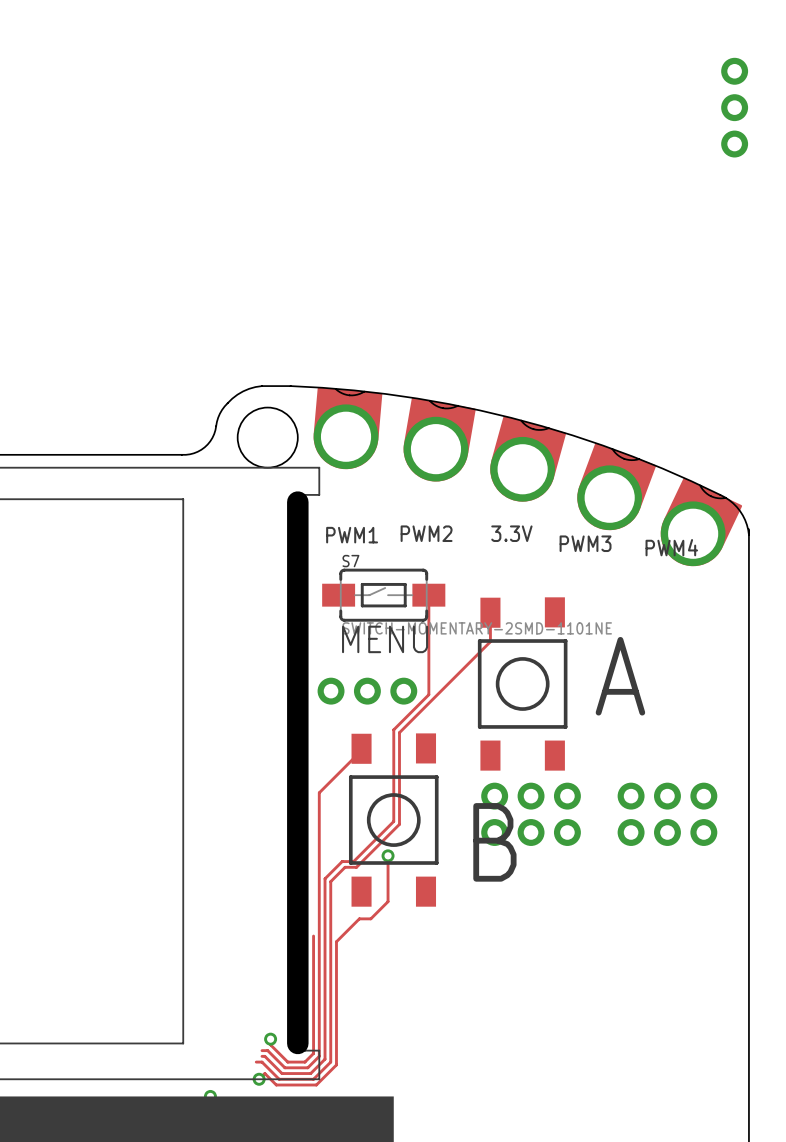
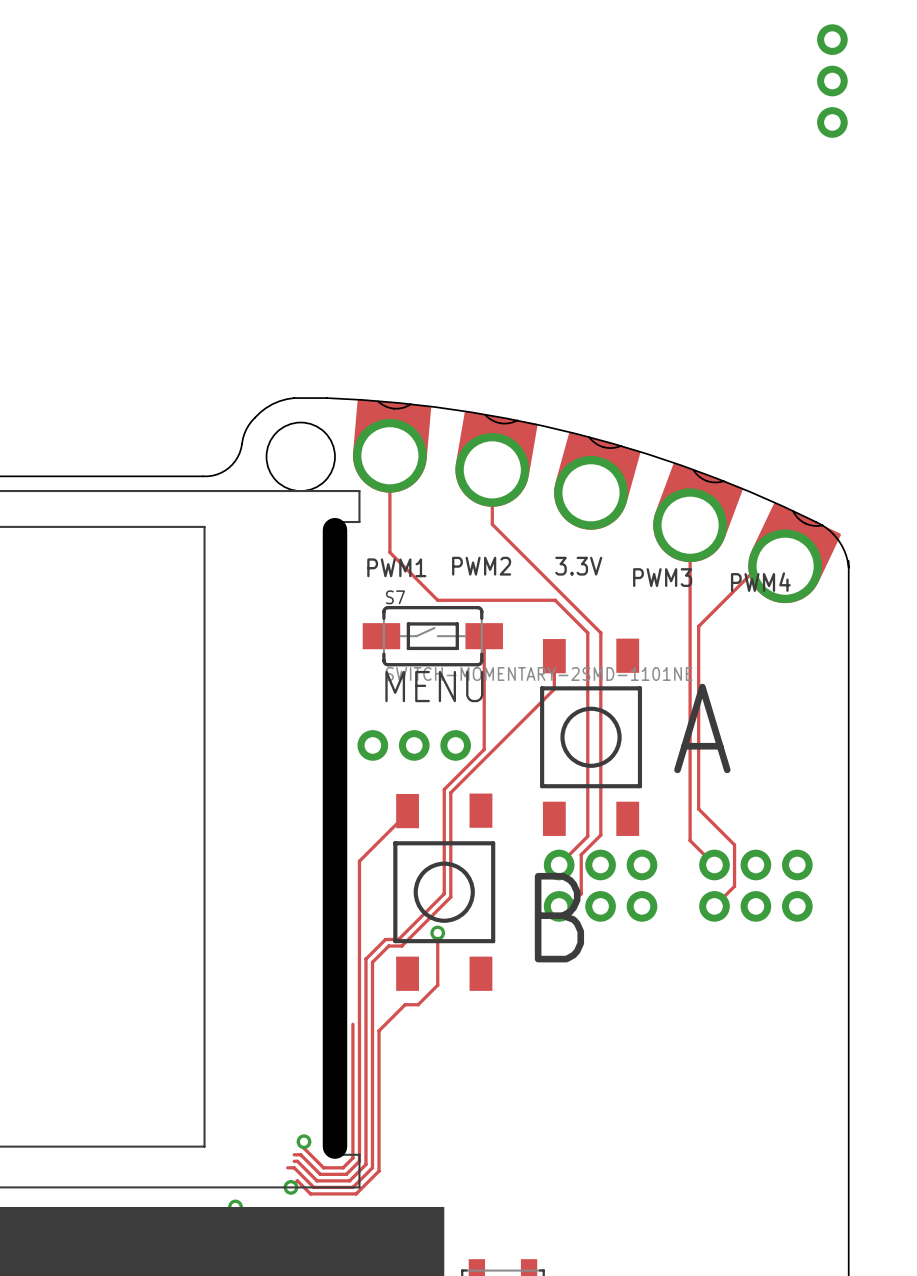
track: none -> (389, 455) (389, 552) (437, 600) (555, 600) (587, 632) (587, 836) (559, 864)
track: none -> (492, 469) (492, 524) (600, 632) (600, 835) (581, 854) (581, 893) (561, 913) (561, 908) (559, 906)
track: none -> (690, 525) (690, 840) (714, 864)
track: none -> (785, 566) (758, 566) (698, 626) (698, 809) (734, 844) (734, 886) (714, 906)

